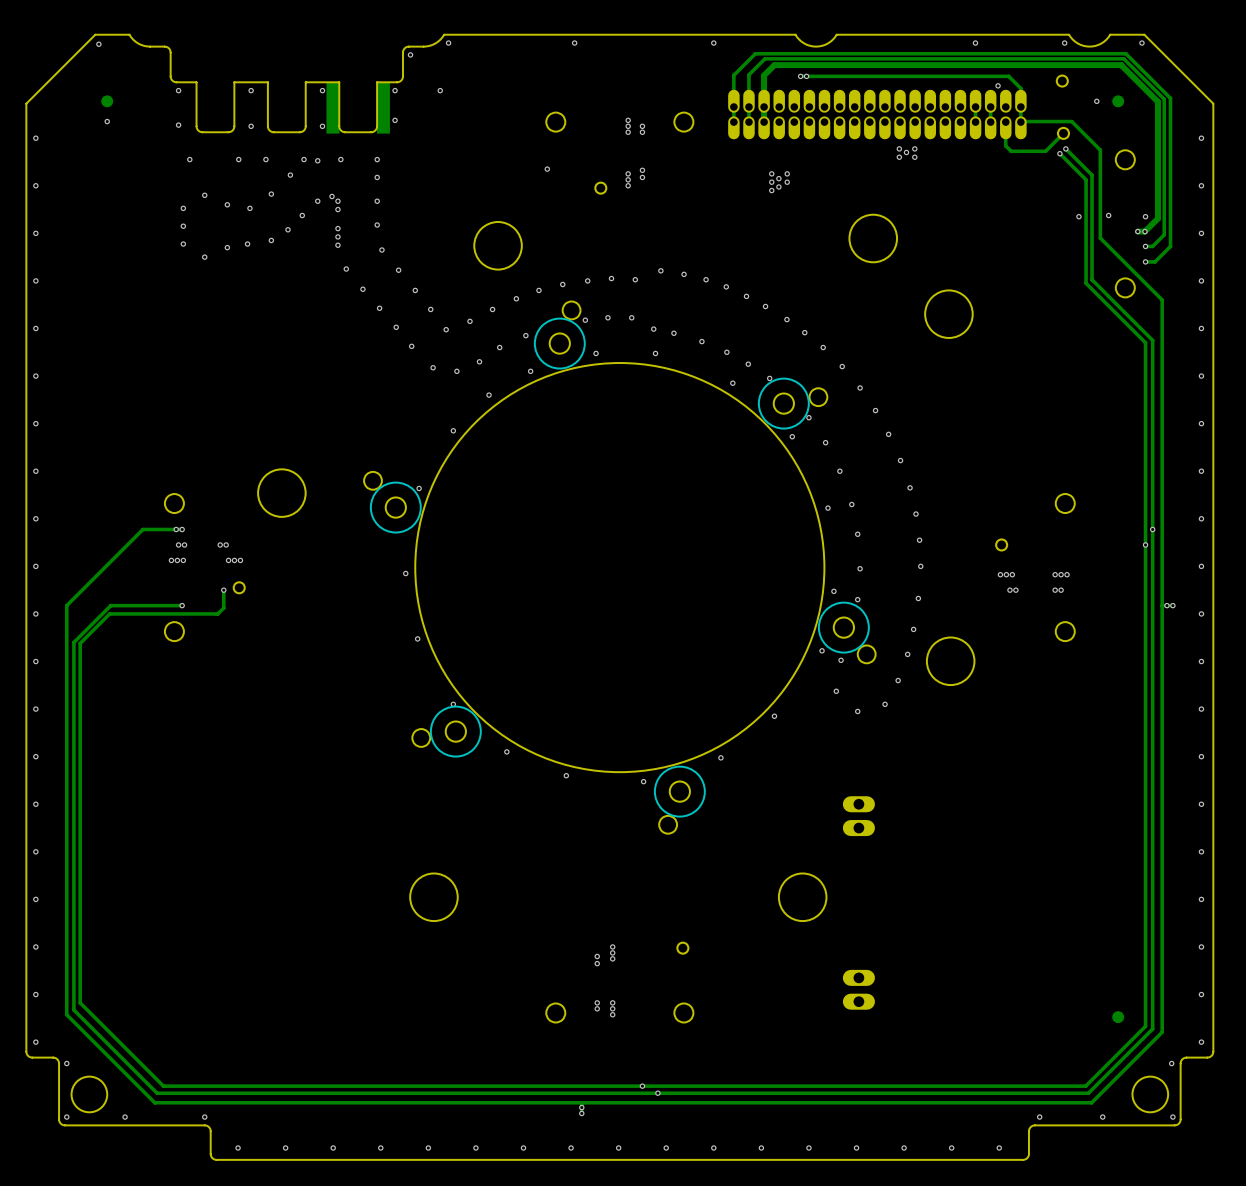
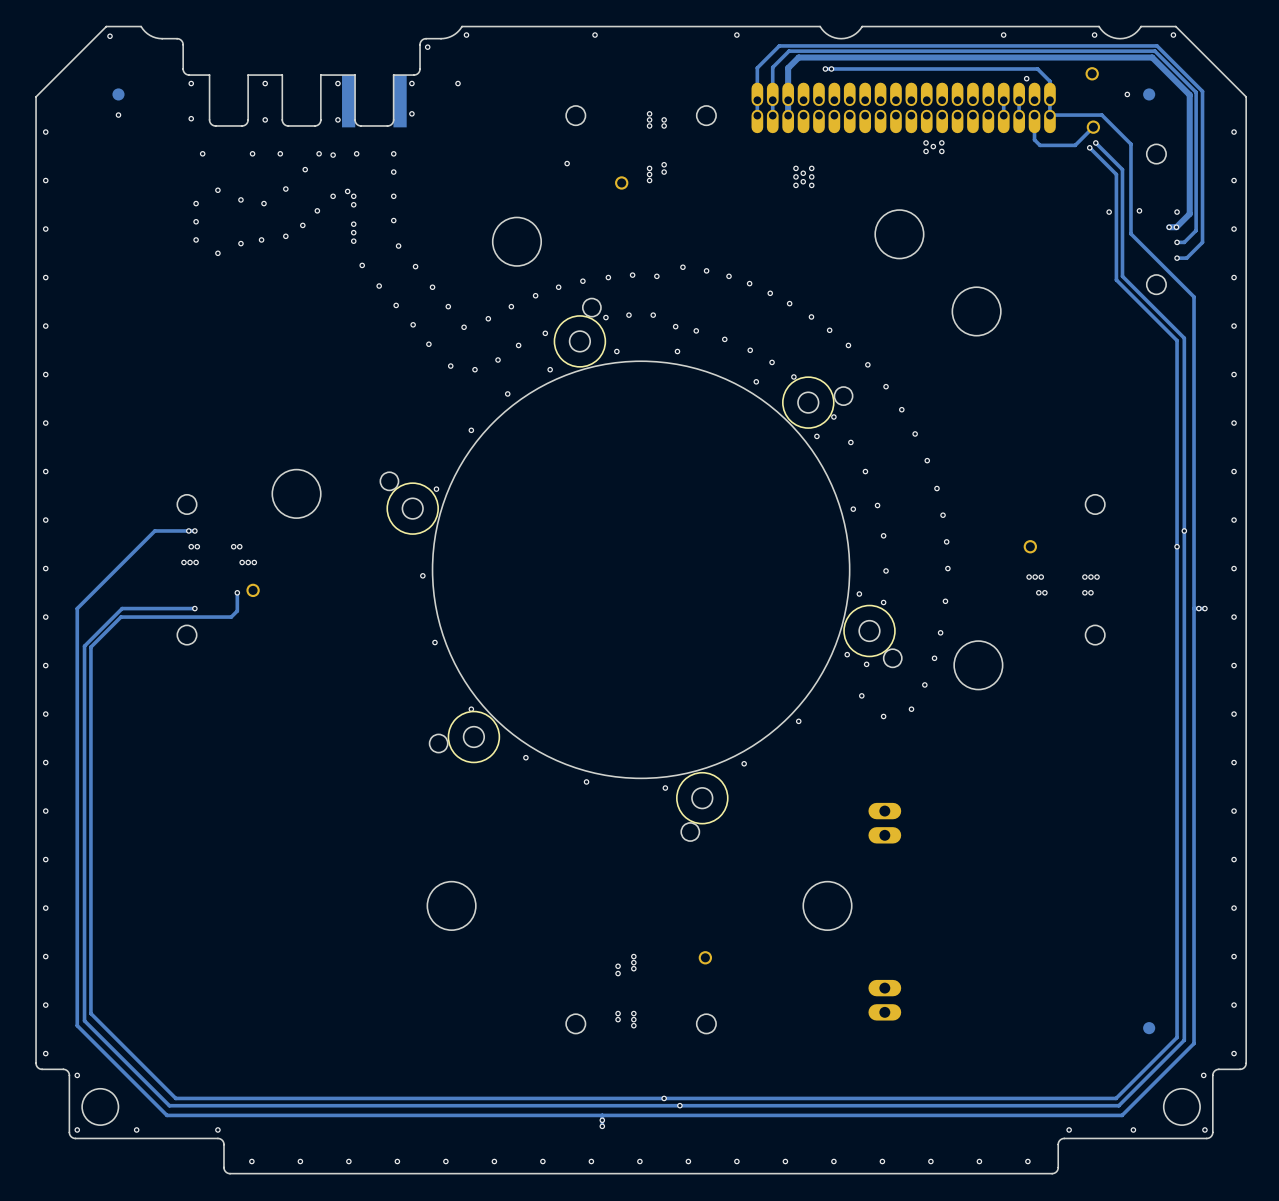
via: none -> (811, 185)

